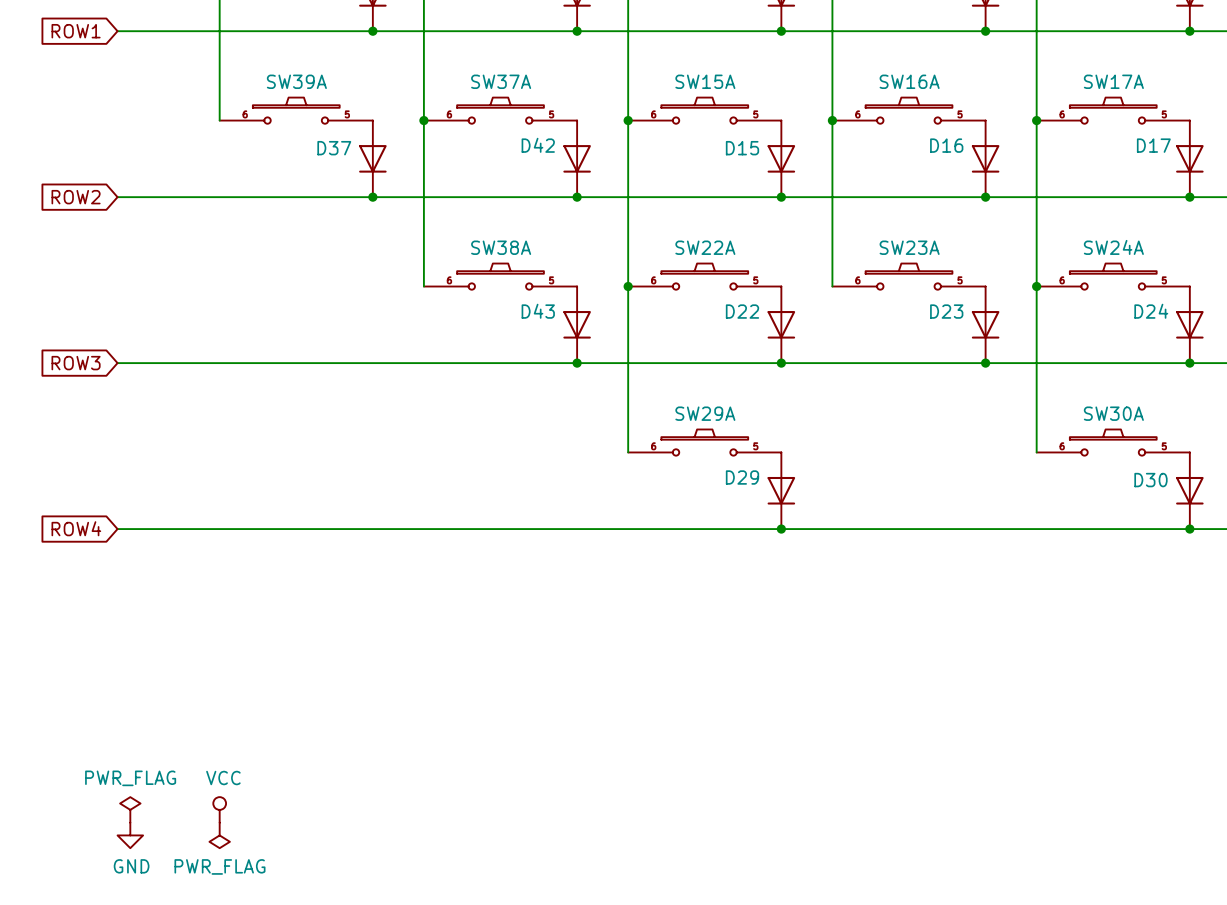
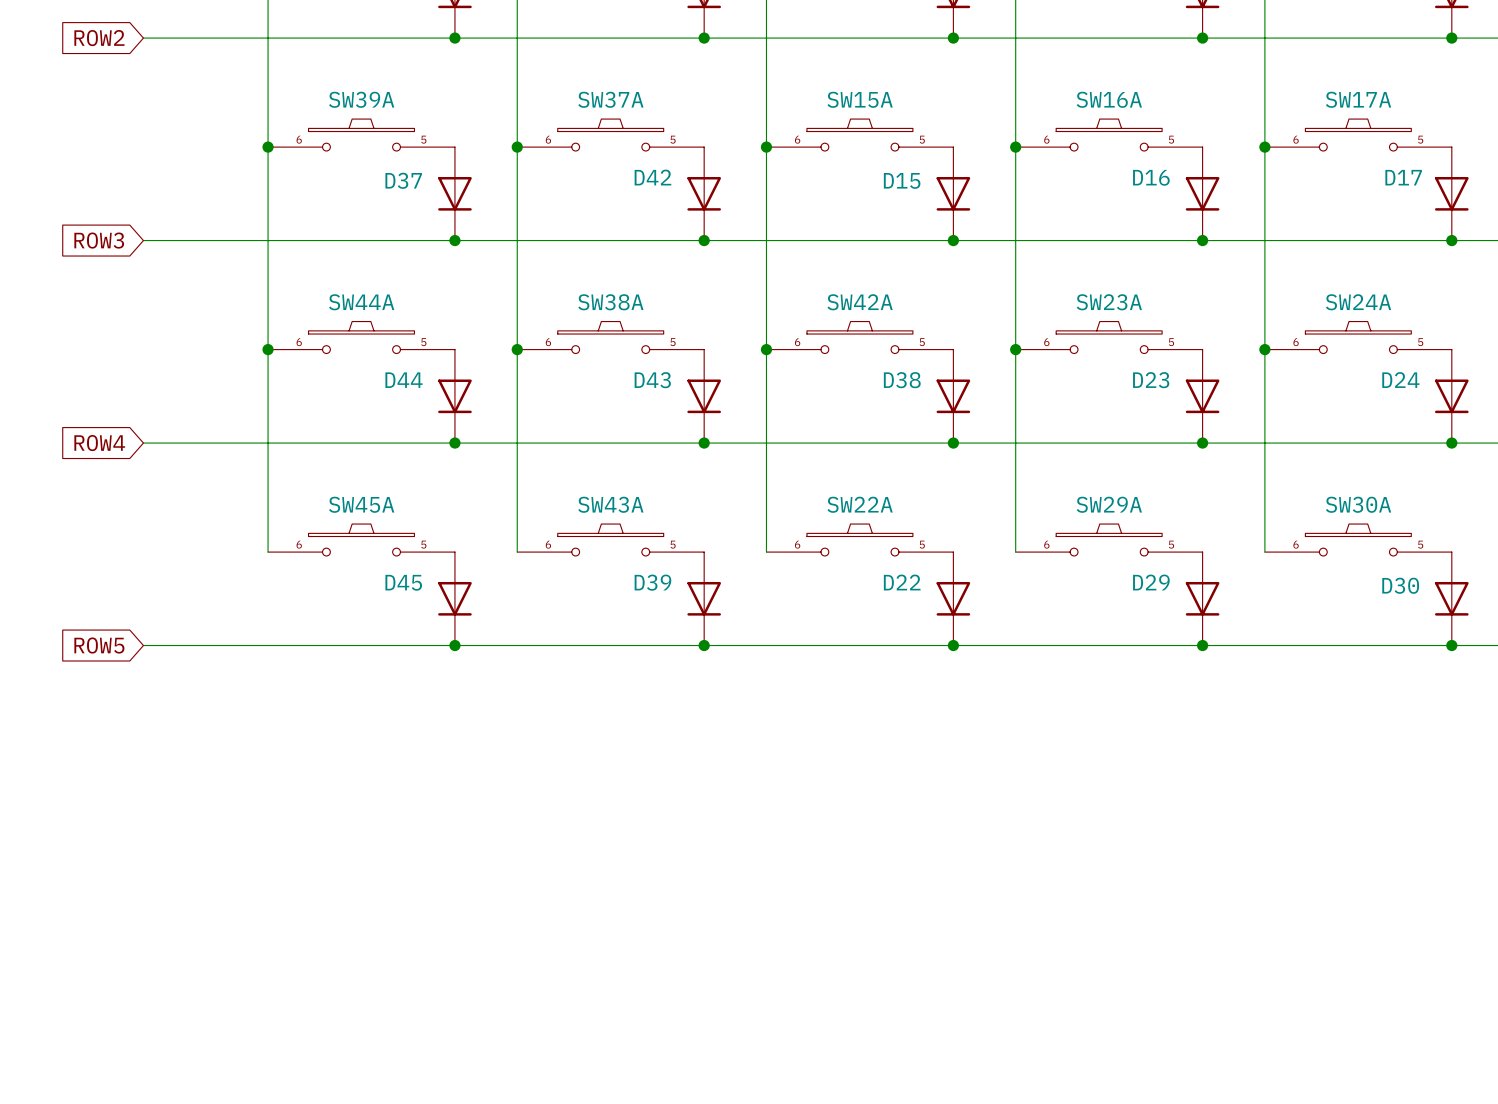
global label: ROW1 (76, 31) -> ROW2 (99, 38)
wire: none -> (268, 147) (268, 552)
junction: none -> (268, 147)
global label: ROW2 (76, 197) -> ROW3 (99, 240)
SW22A name: SW22A (705, 247) -> SW42A (860, 302)
SW44A: none -> (361, 337)
junction: none -> (268, 349)
wire: none -> (517, 349) (517, 552)
junction: none -> (517, 349)
wire: none -> (1015, 349) (1015, 552)
junction: none -> (1015, 349)
D22 name: D22 (742, 311) -> D38 (902, 380)
D44: none -> (454, 396)
global label: ROW3 (76, 363) -> ROW4 (99, 443)
junction: none -> (454, 443)
SW29A name: SW29A (705, 413) -> SW22A (860, 504)
SW45A: none -> (361, 540)
SW43A: none -> (610, 540)
SW29A: none -> (1109, 540)
D29 name: D29 (742, 477) -> D22 (902, 582)
D45: none -> (454, 598)
D39: none -> (704, 598)
D29: none -> (1202, 598)
global label: ROW4 (76, 528) -> ROW5 (99, 645)
junction: none -> (454, 645)
junction: none -> (704, 645)
junction: none -> (1202, 645)
power symbol: PWR_FLAG (130, 809) -> none
power symbol: VCC (219, 809) -> none
power symbol: GND (130, 835) -> none
power symbol: PWR_FLAG (219, 835) -> none

